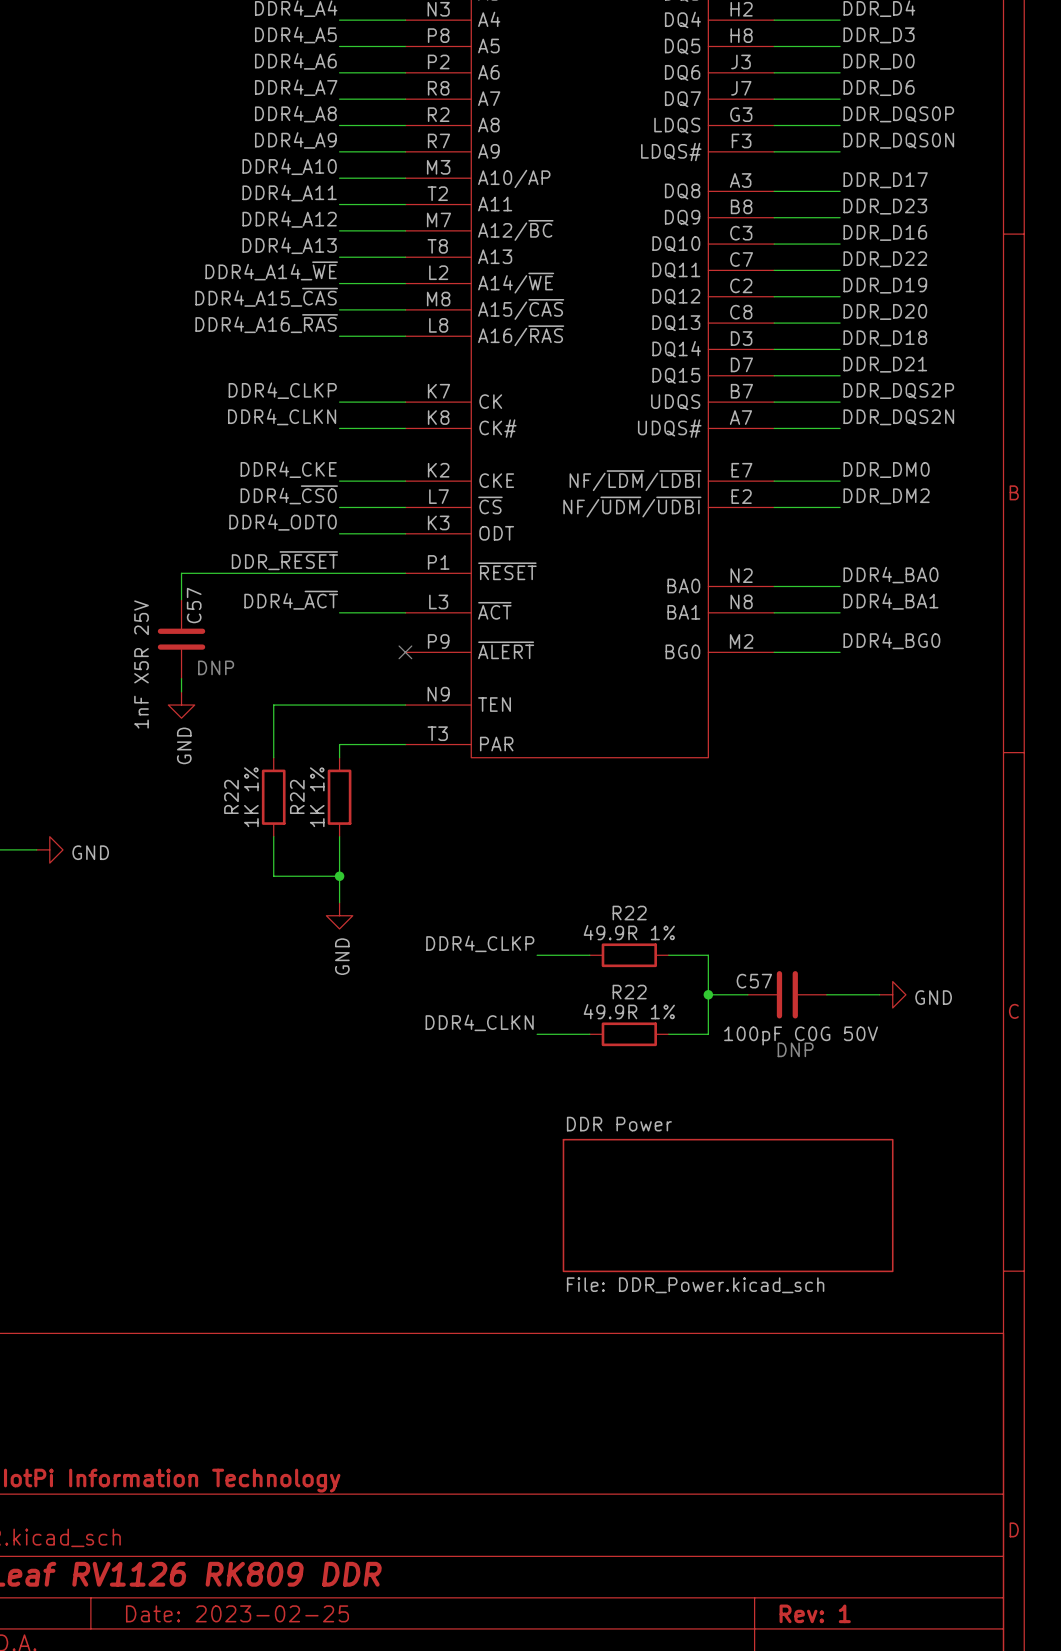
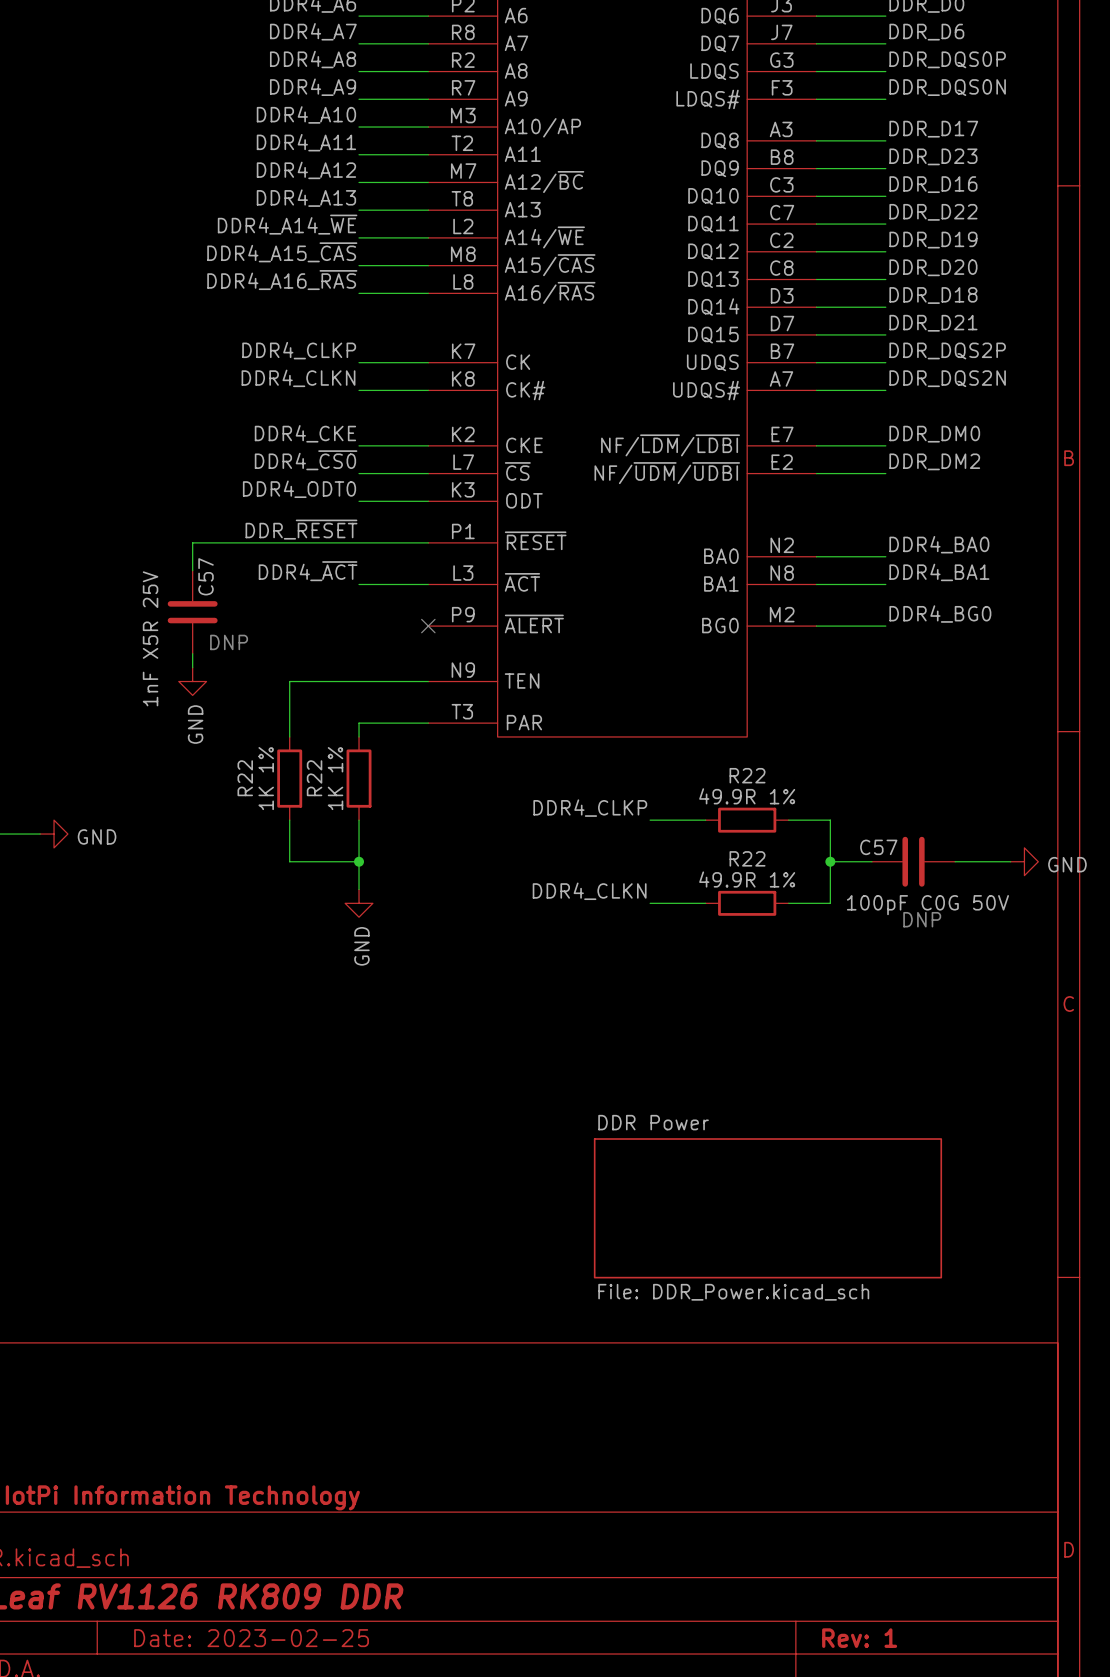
R22: none -> 49.9R 1% (747, 820)
junction: none -> (830, 861)
R22: none -> 49.9R 1% (747, 903)
label position: DDR4_CLKP (480, 943) -> DDR4_CLKP (590, 808)
wire: (537, 955) (589, 955) -> (650, 820) (705, 820)
R22: 49.9R 1% (629, 955) -> none
wire: (668, 955) (708, 955) (708, 1034) (668, 1034) -> (788, 820) (830, 820) (830, 903) (788, 903)
wire: (708, 994) (747, 994) -> (830, 861) (871, 861)
junction: (708, 994) -> none
C57 position: (787, 994) -> (913, 861)
wire: (826, 994) (879, 994) -> (955, 861) (1010, 861)
power symbol position: GND (892, 994) -> GND (1024, 861)
label position: DDR4_CLKN (479, 1022) -> DDR4_CLKN (589, 891)
wire: (537, 1034) (589, 1034) -> (650, 903) (705, 903)
R22: 49.9R 1% (629, 1034) -> none
text position: DNP (795, 1049) -> DNP (922, 919)

